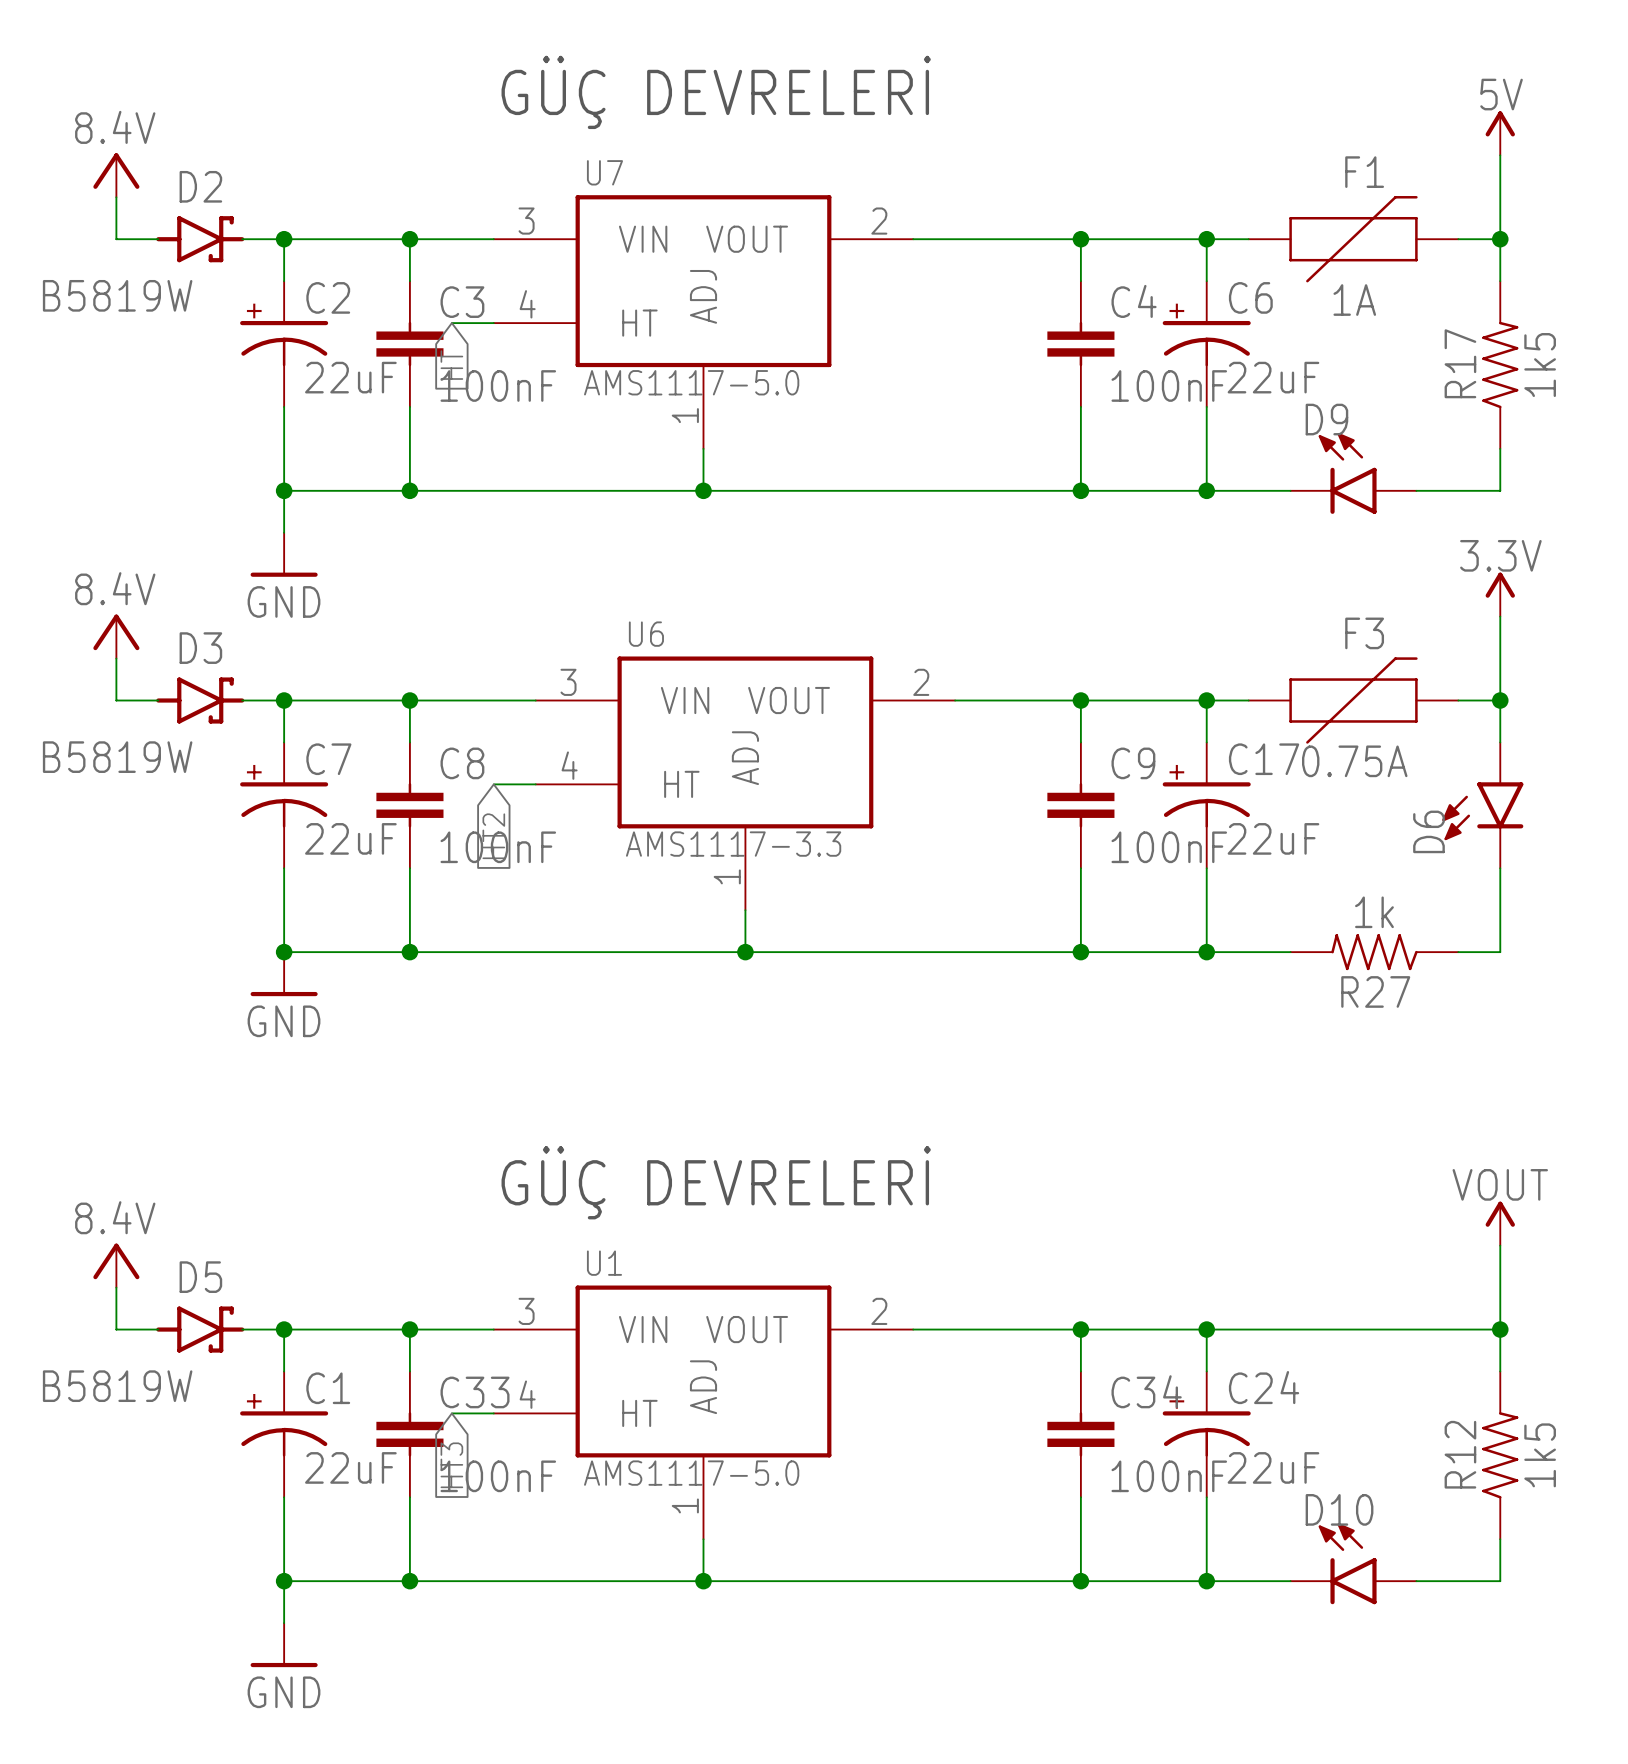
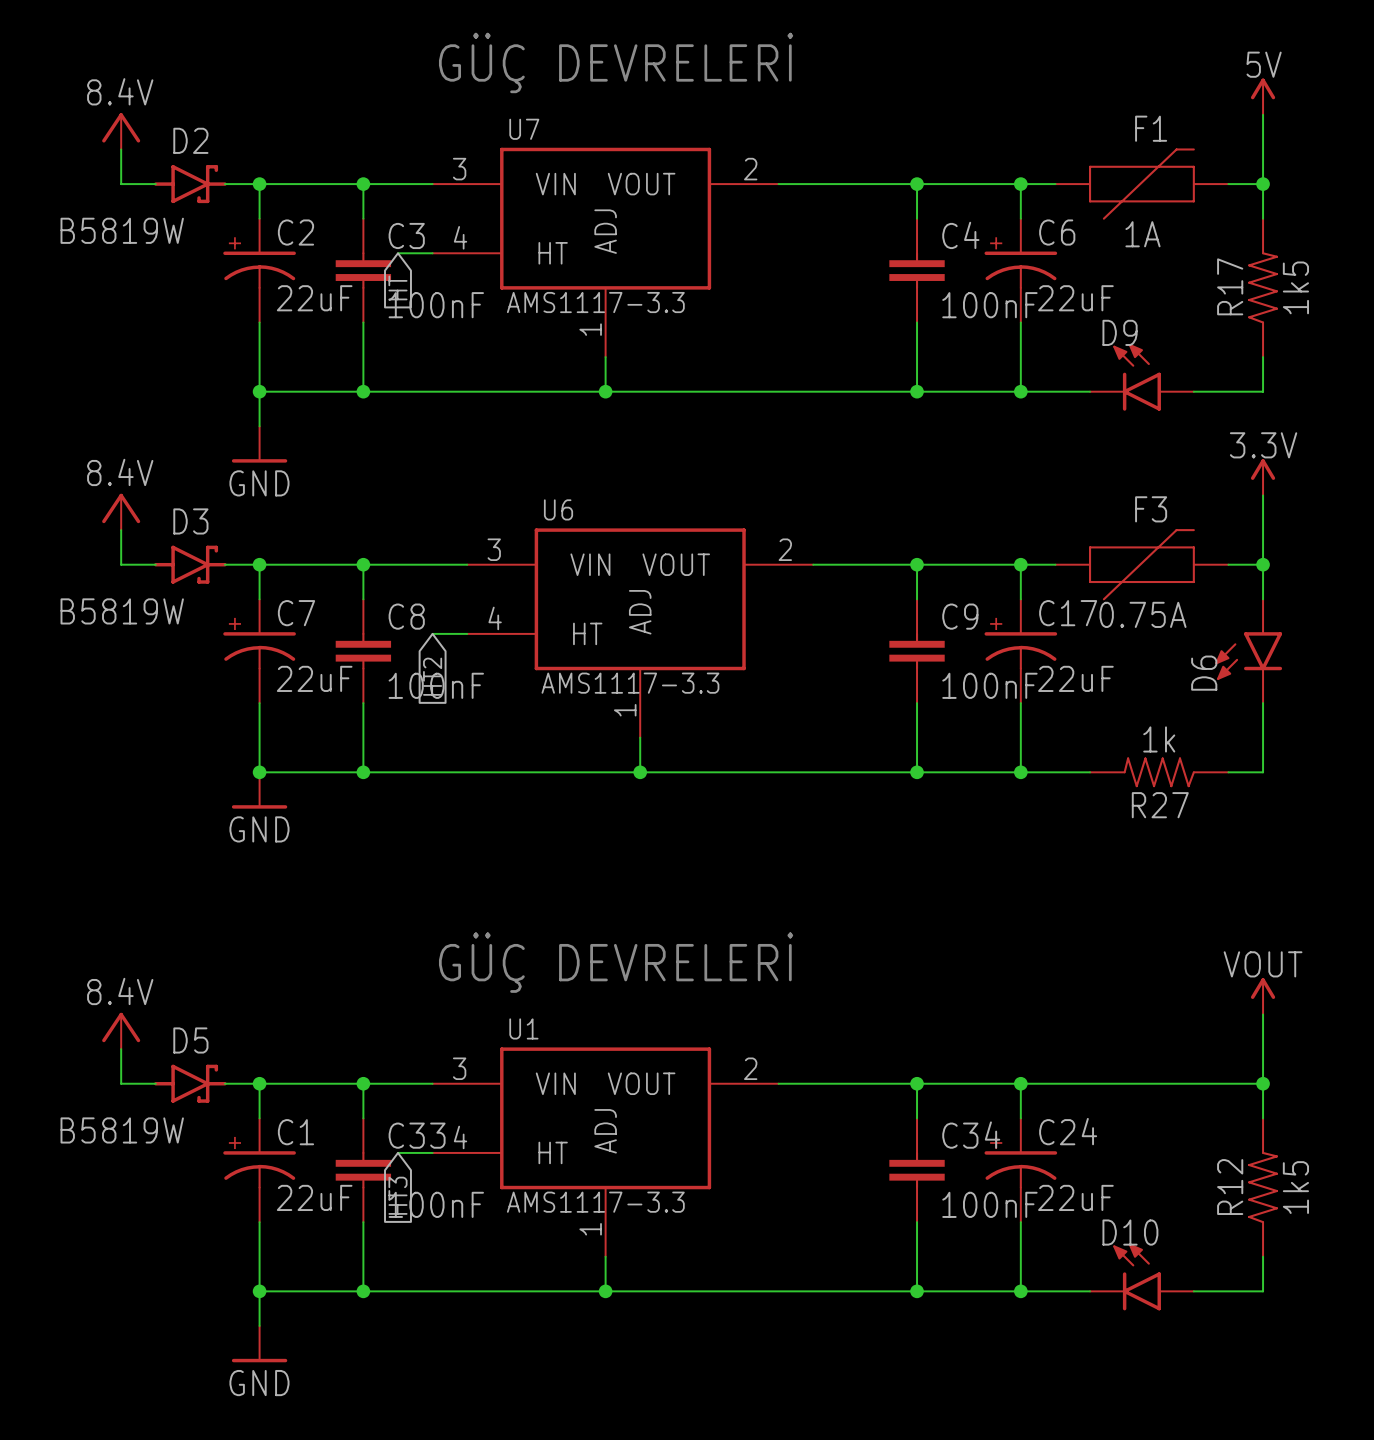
U7 value: AMS1117-5.0 (691, 382) -> AMS1117-3.3 (595, 302)
U1 value: AMS1117-5.0 (691, 1473) -> AMS1117-3.3 (595, 1202)

